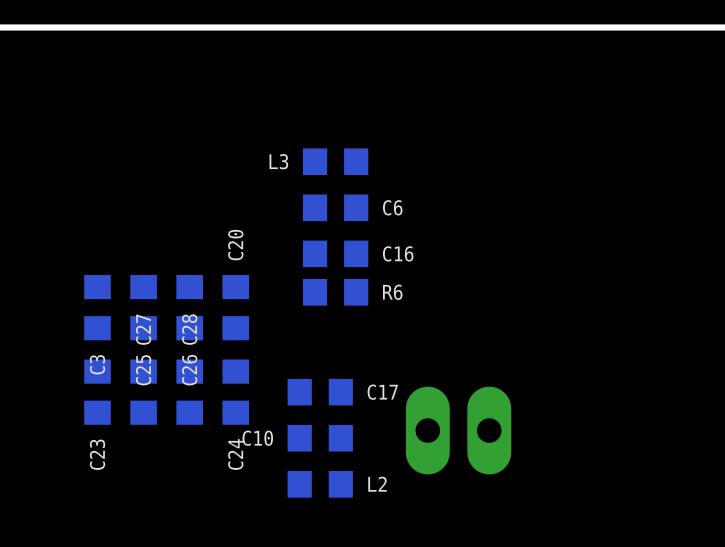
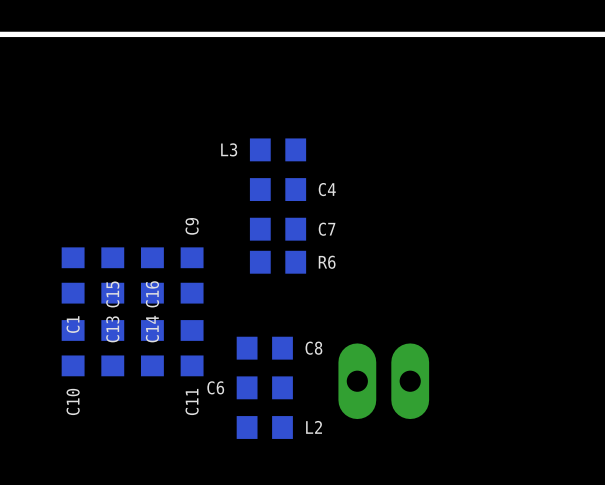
C6 name: C6 (392, 207) -> C4 (327, 189)
C20 name: C20 (235, 245) -> C9 (192, 226)
C16 name: C16 (398, 253) -> C7 (327, 229)
C27 name: C27 (143, 329) -> C15 (112, 294)
C28 name: C28 (189, 329) -> C16 (152, 294)
C3 name: C3 (97, 364) -> C1 (73, 324)
C25 name: C25 (143, 370) -> C13 (112, 329)
C26 name: C26 (189, 370) -> C14 (152, 329)
C17 name: C17 (382, 392) -> C8 (313, 348)
C10 name: C10 (257, 438) -> C6 (215, 387)
C23 name: C23 (97, 454) -> C10 (73, 401)
C24 name: C24 (235, 454) -> C11 (192, 401)

